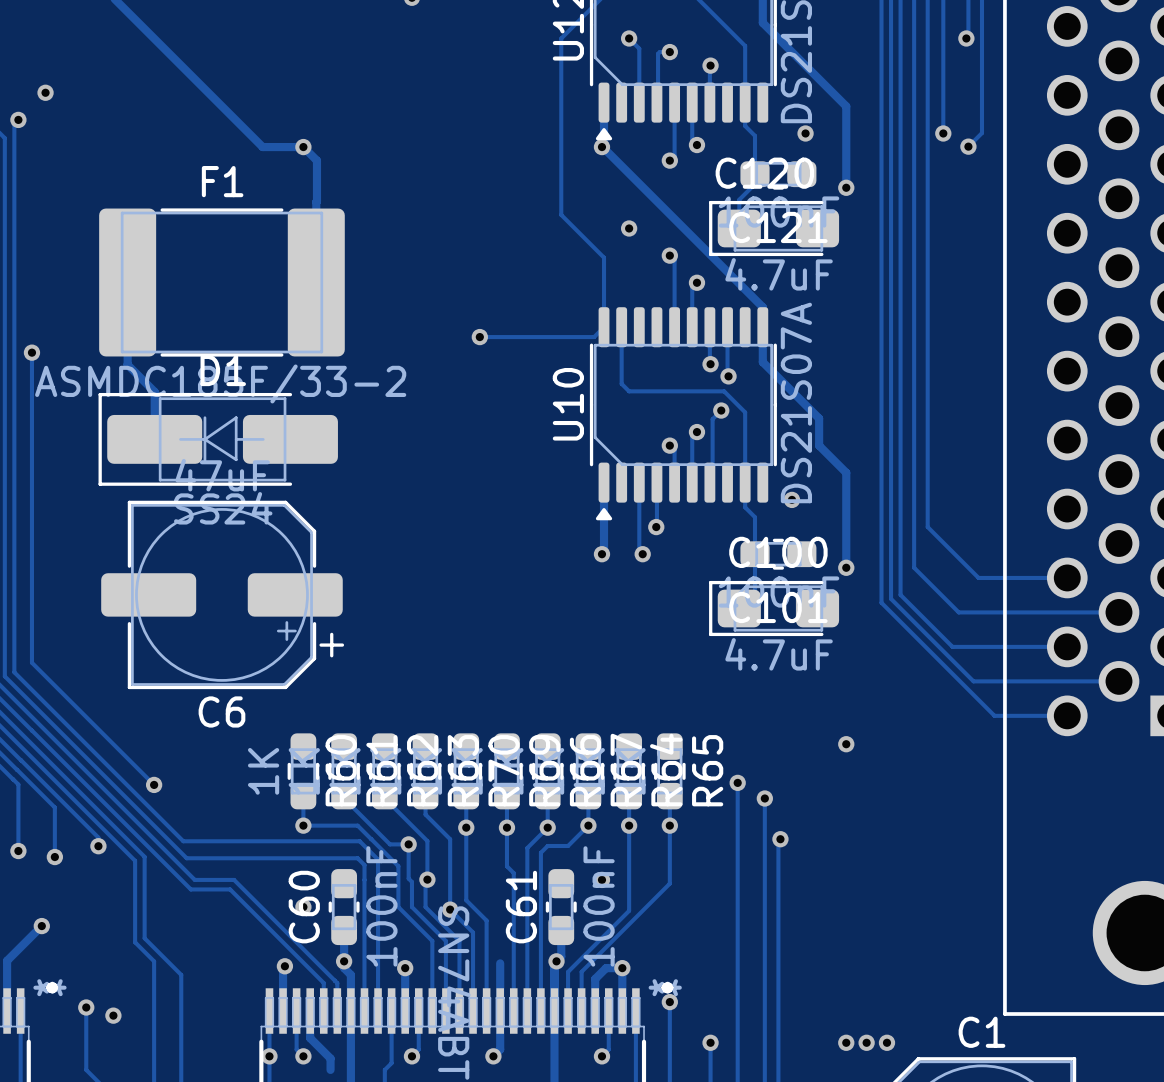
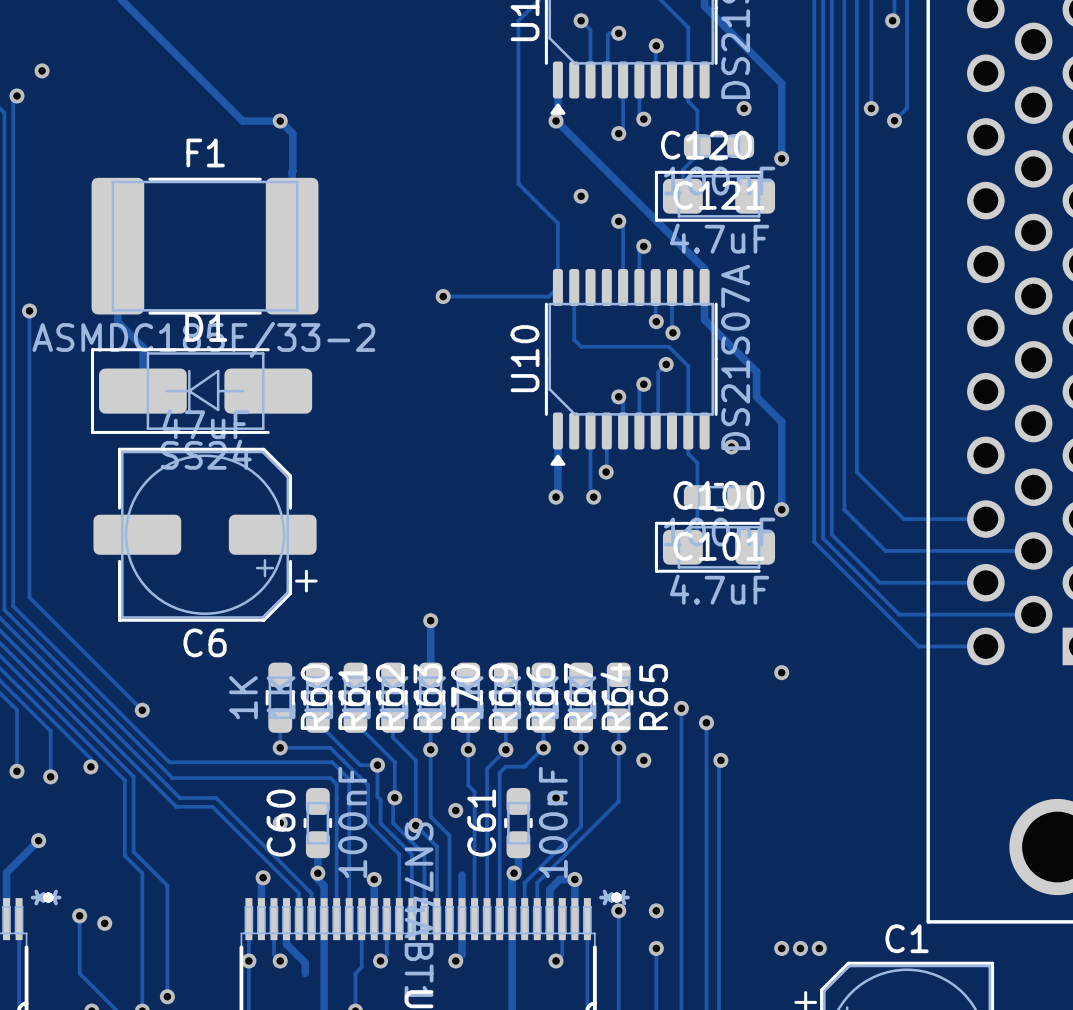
track: none -> (430, 620) (430, 674)
via: none -> (430, 620)
via: none -> (643, 760)
via: none -> (455, 810)
via: none -> (656, 910)

